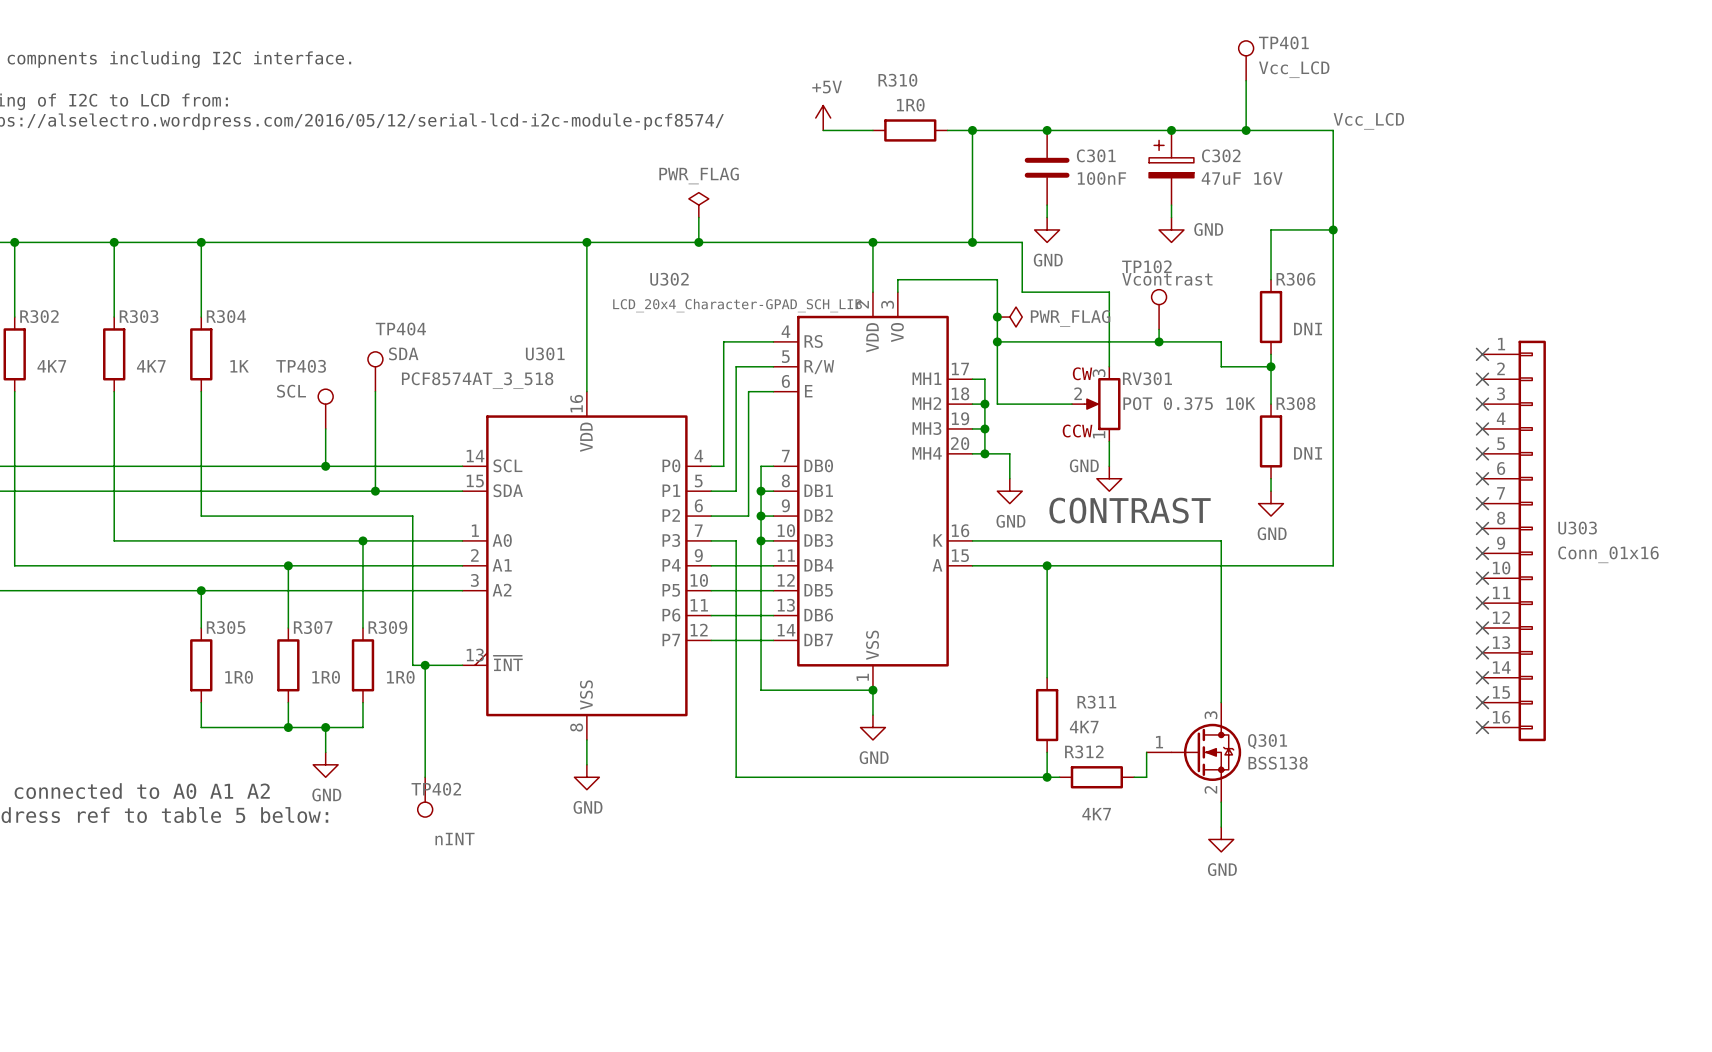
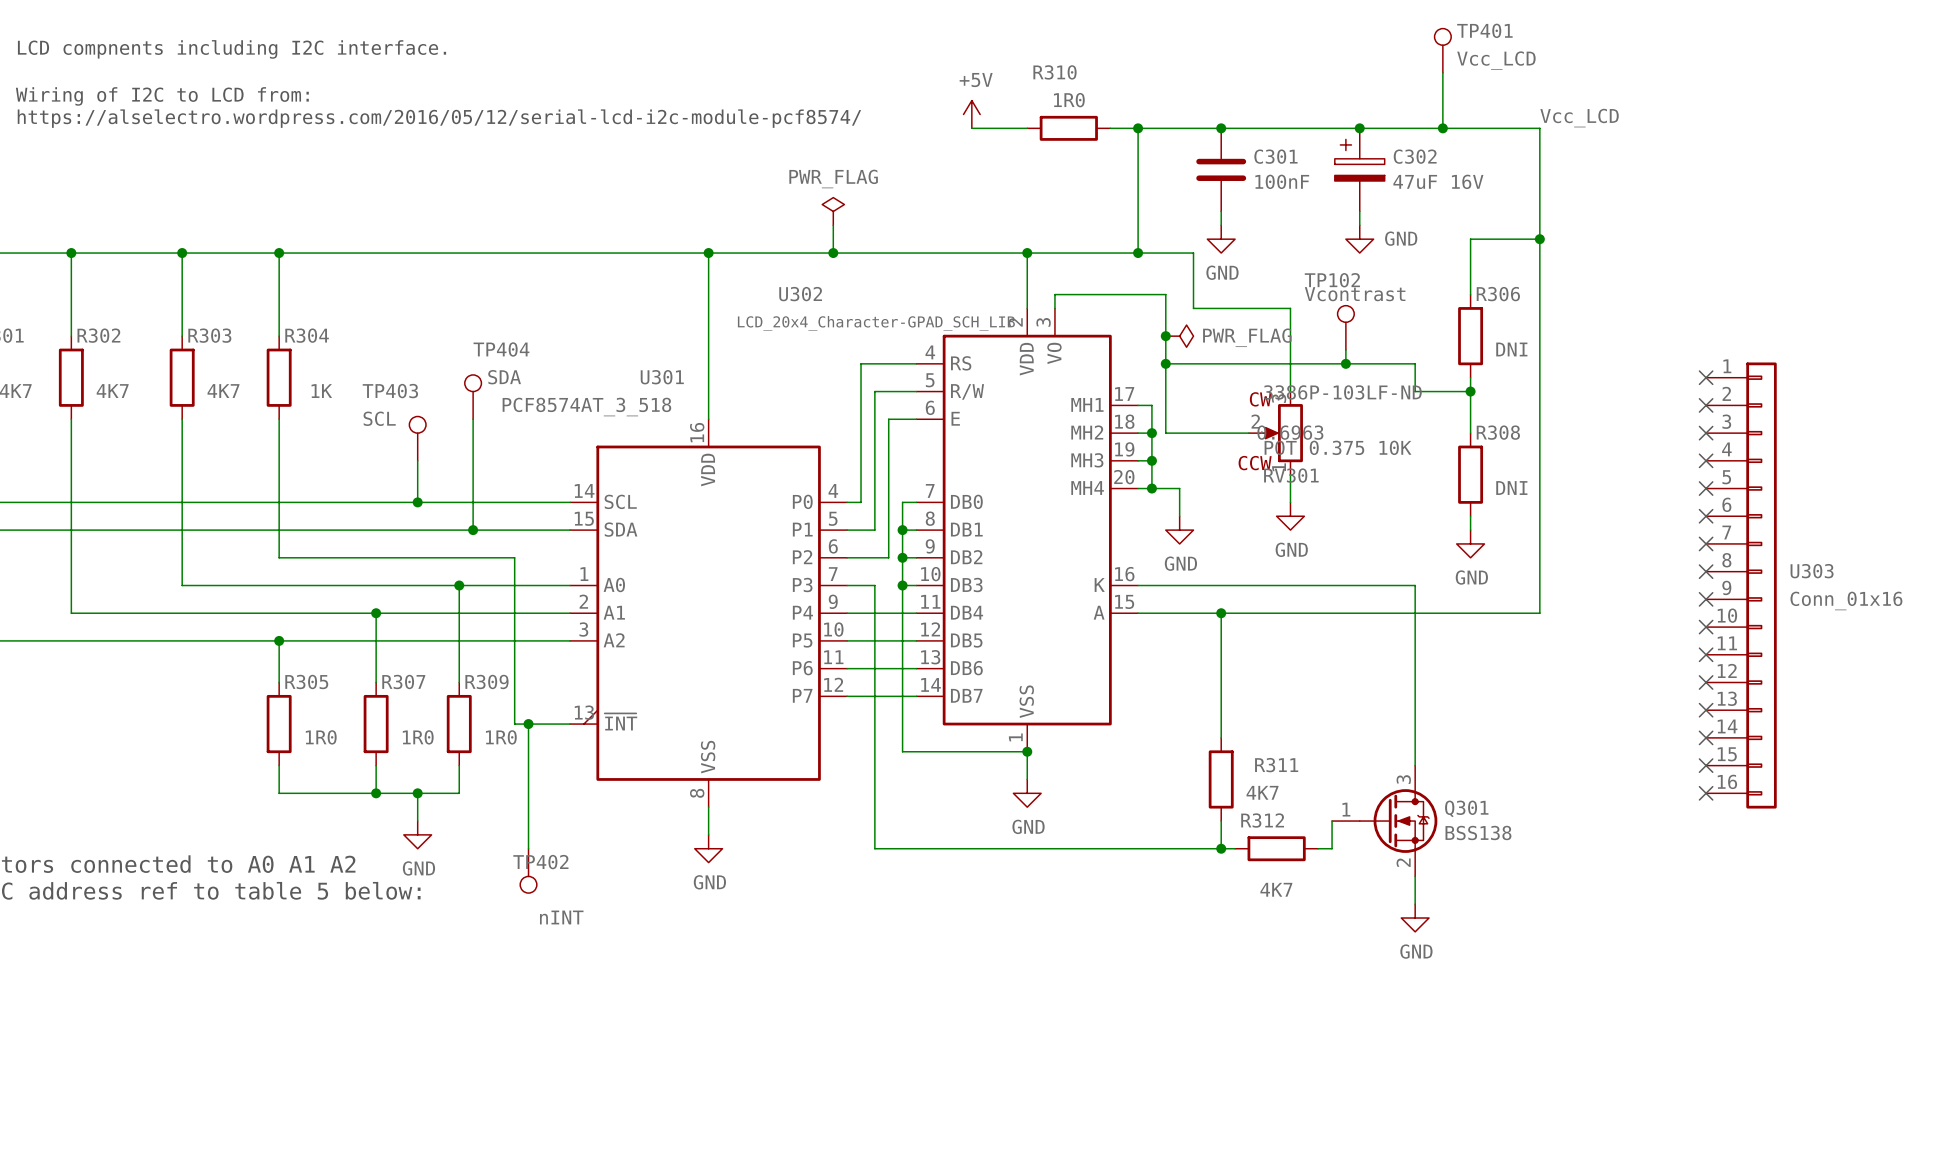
RV301 text: none -> 3386P-103LF-ND (1342, 392)
RV301 name position: RV301 (1147, 378) -> RV301 (1291, 475)
RV301 text: none -> 0.6963 (1290, 432)
RV301 value position: POT 0.375 10K (1189, 403) -> POT 0.375 10K (1338, 447)
power symbol text position: GND (1084, 465) -> GND (1291, 549)
text: CONTRAST (1130, 510) -> none

